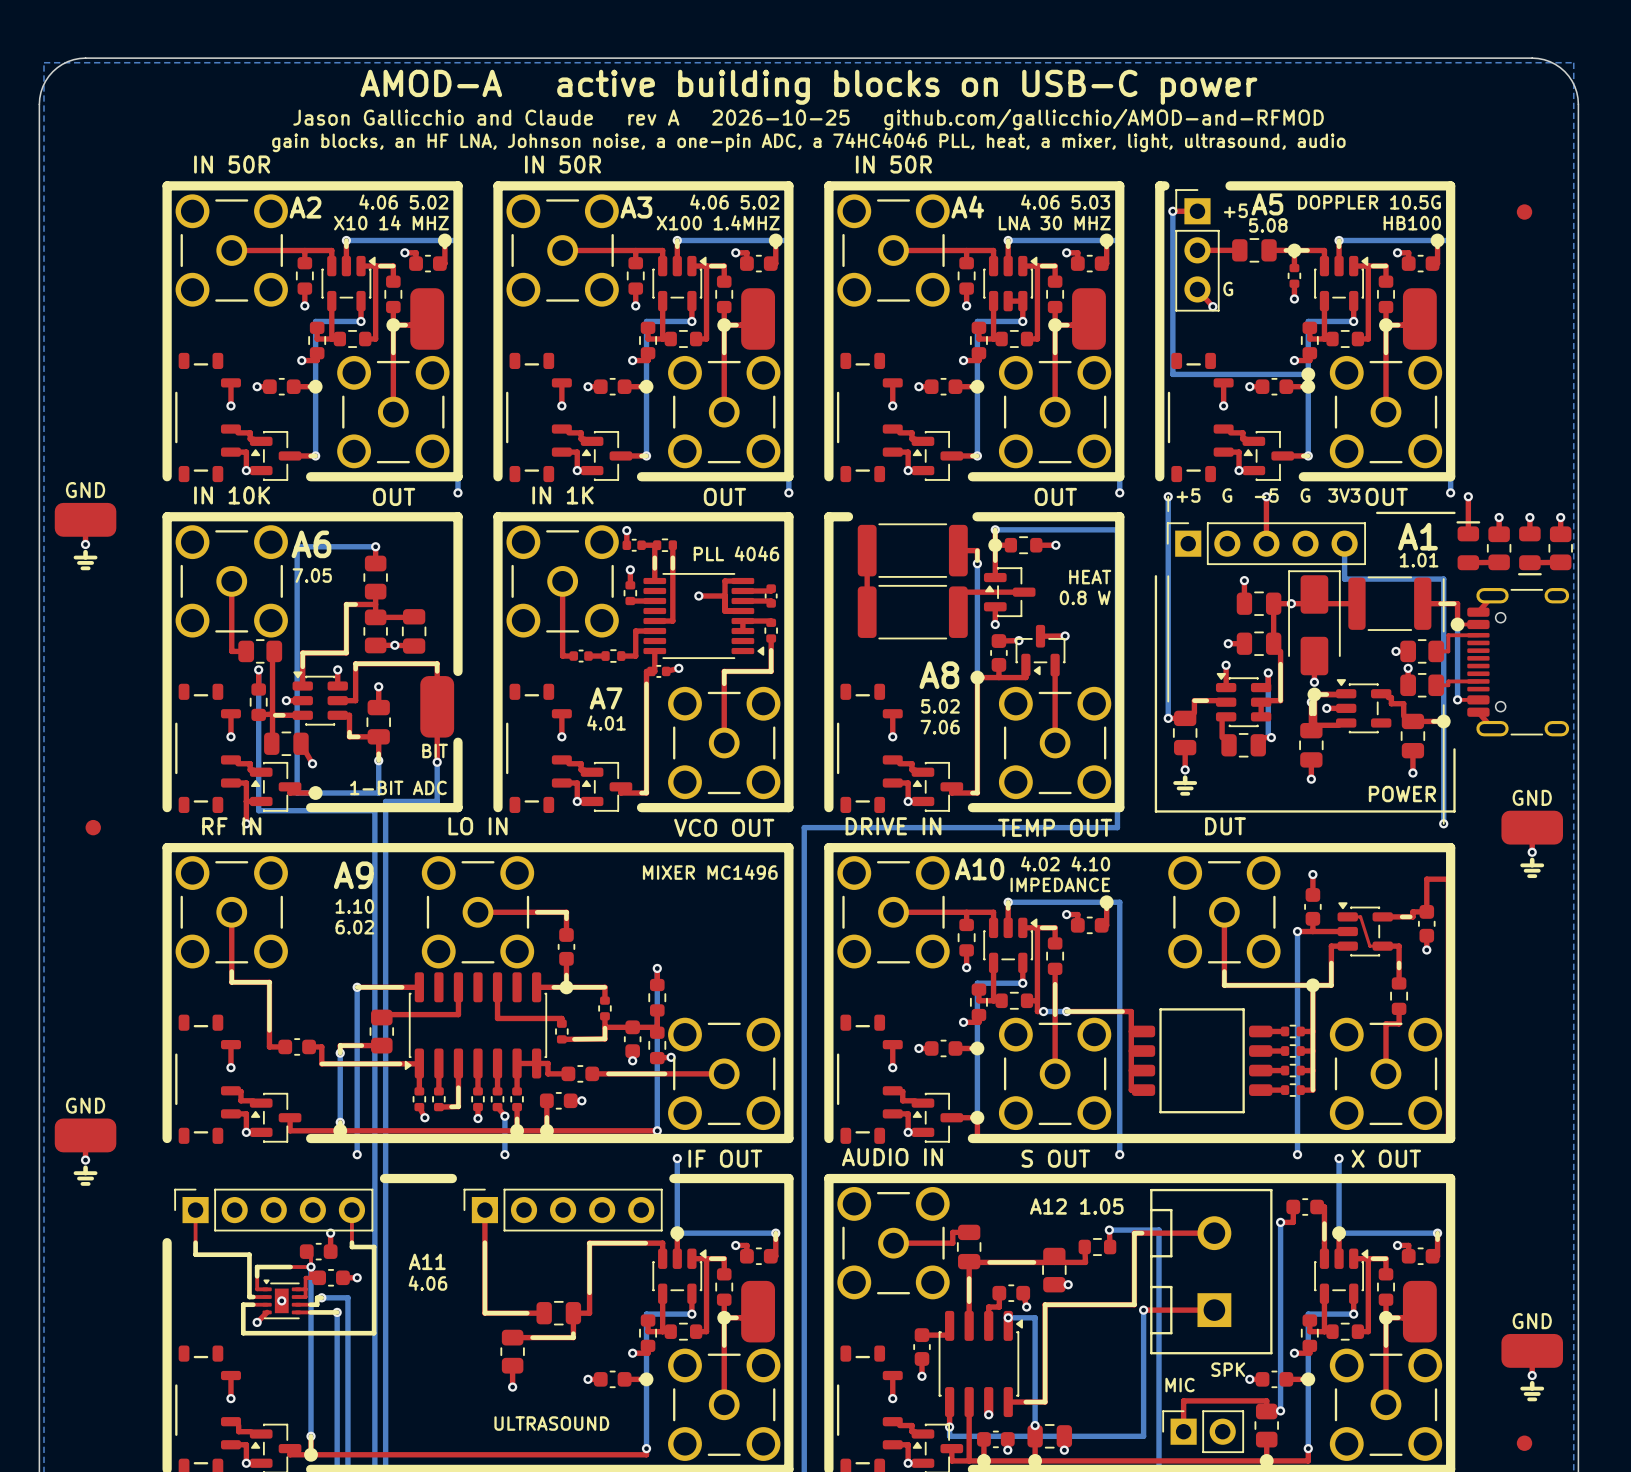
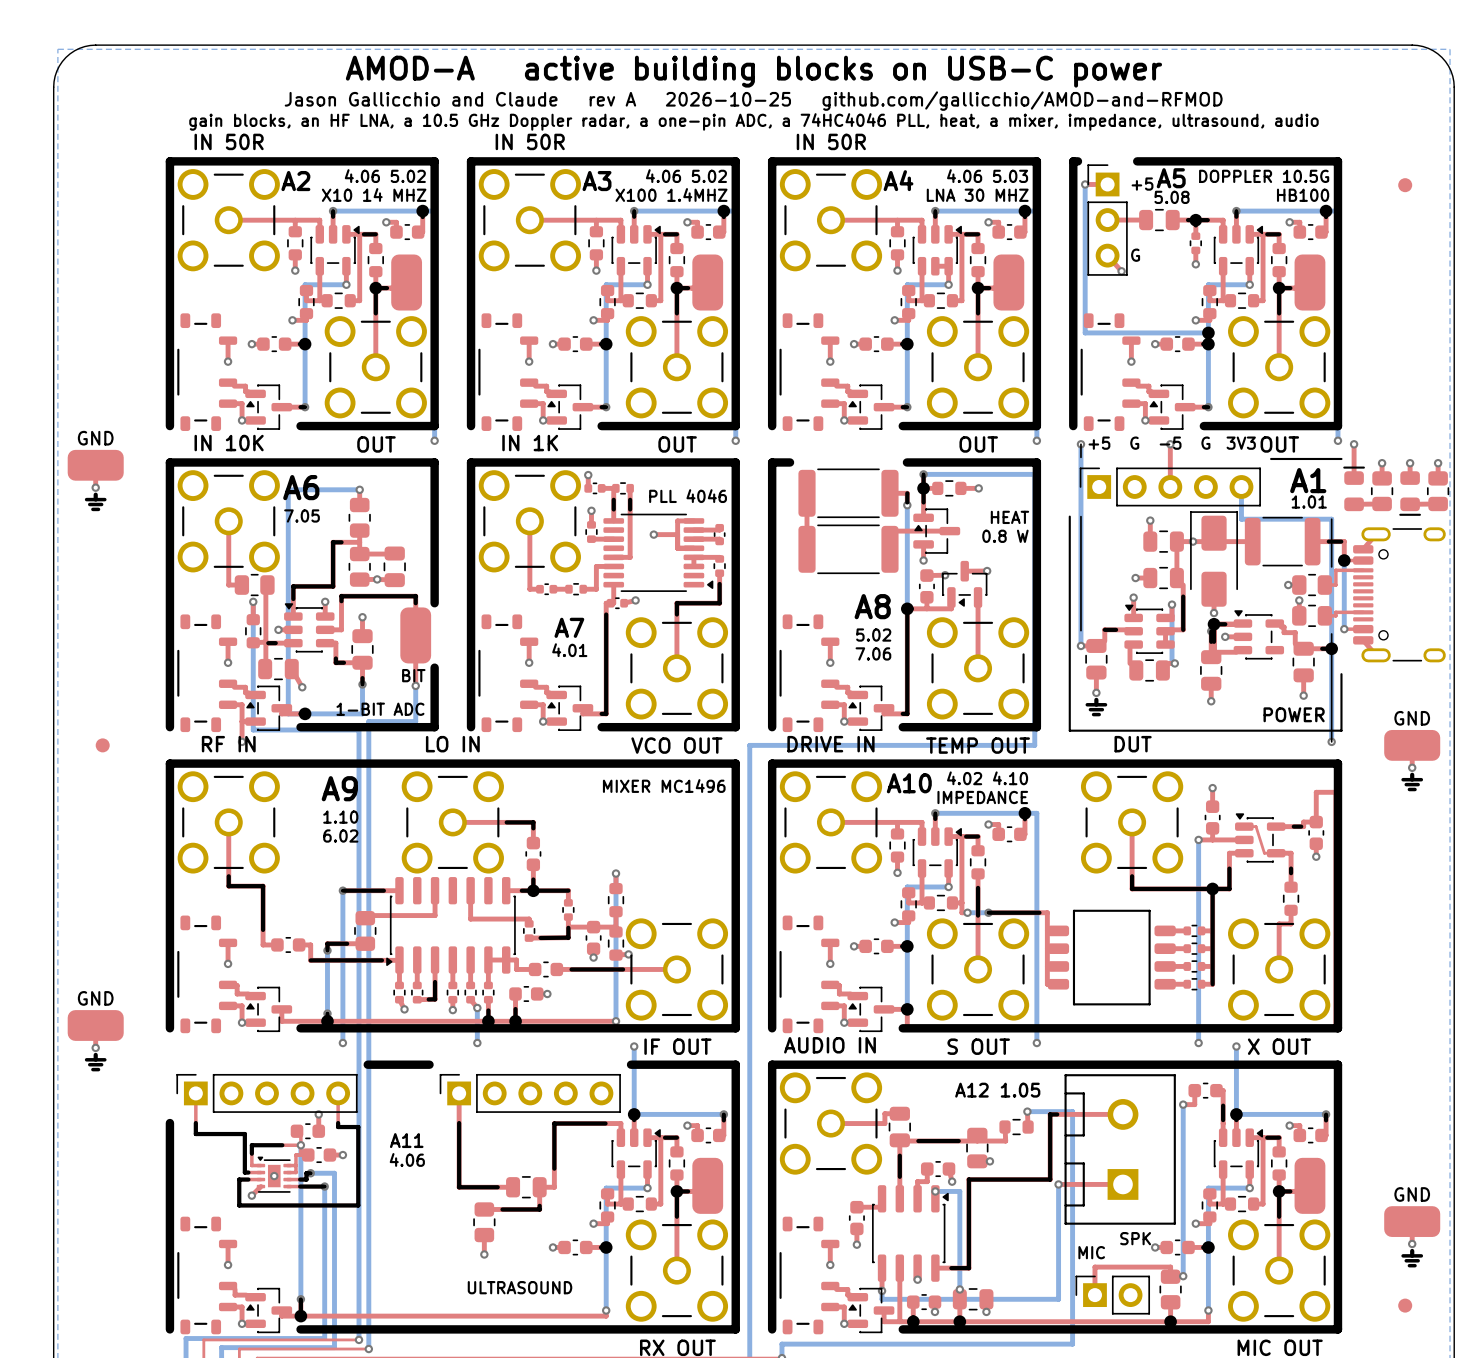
text: gain blocks, an HF LNA, Johnson noise, a one-pin ADC, a 74HC4046 PLL, heat, a mixer, light, ultrasound, audio (808, 142) -> gain blocks, an HF LNA, a 10.5 GHz Doppler radar, a one-pin ADC, a 74HC4046 PLL, heat, a mixer, impedance, ultrasound, audio (753, 121)

